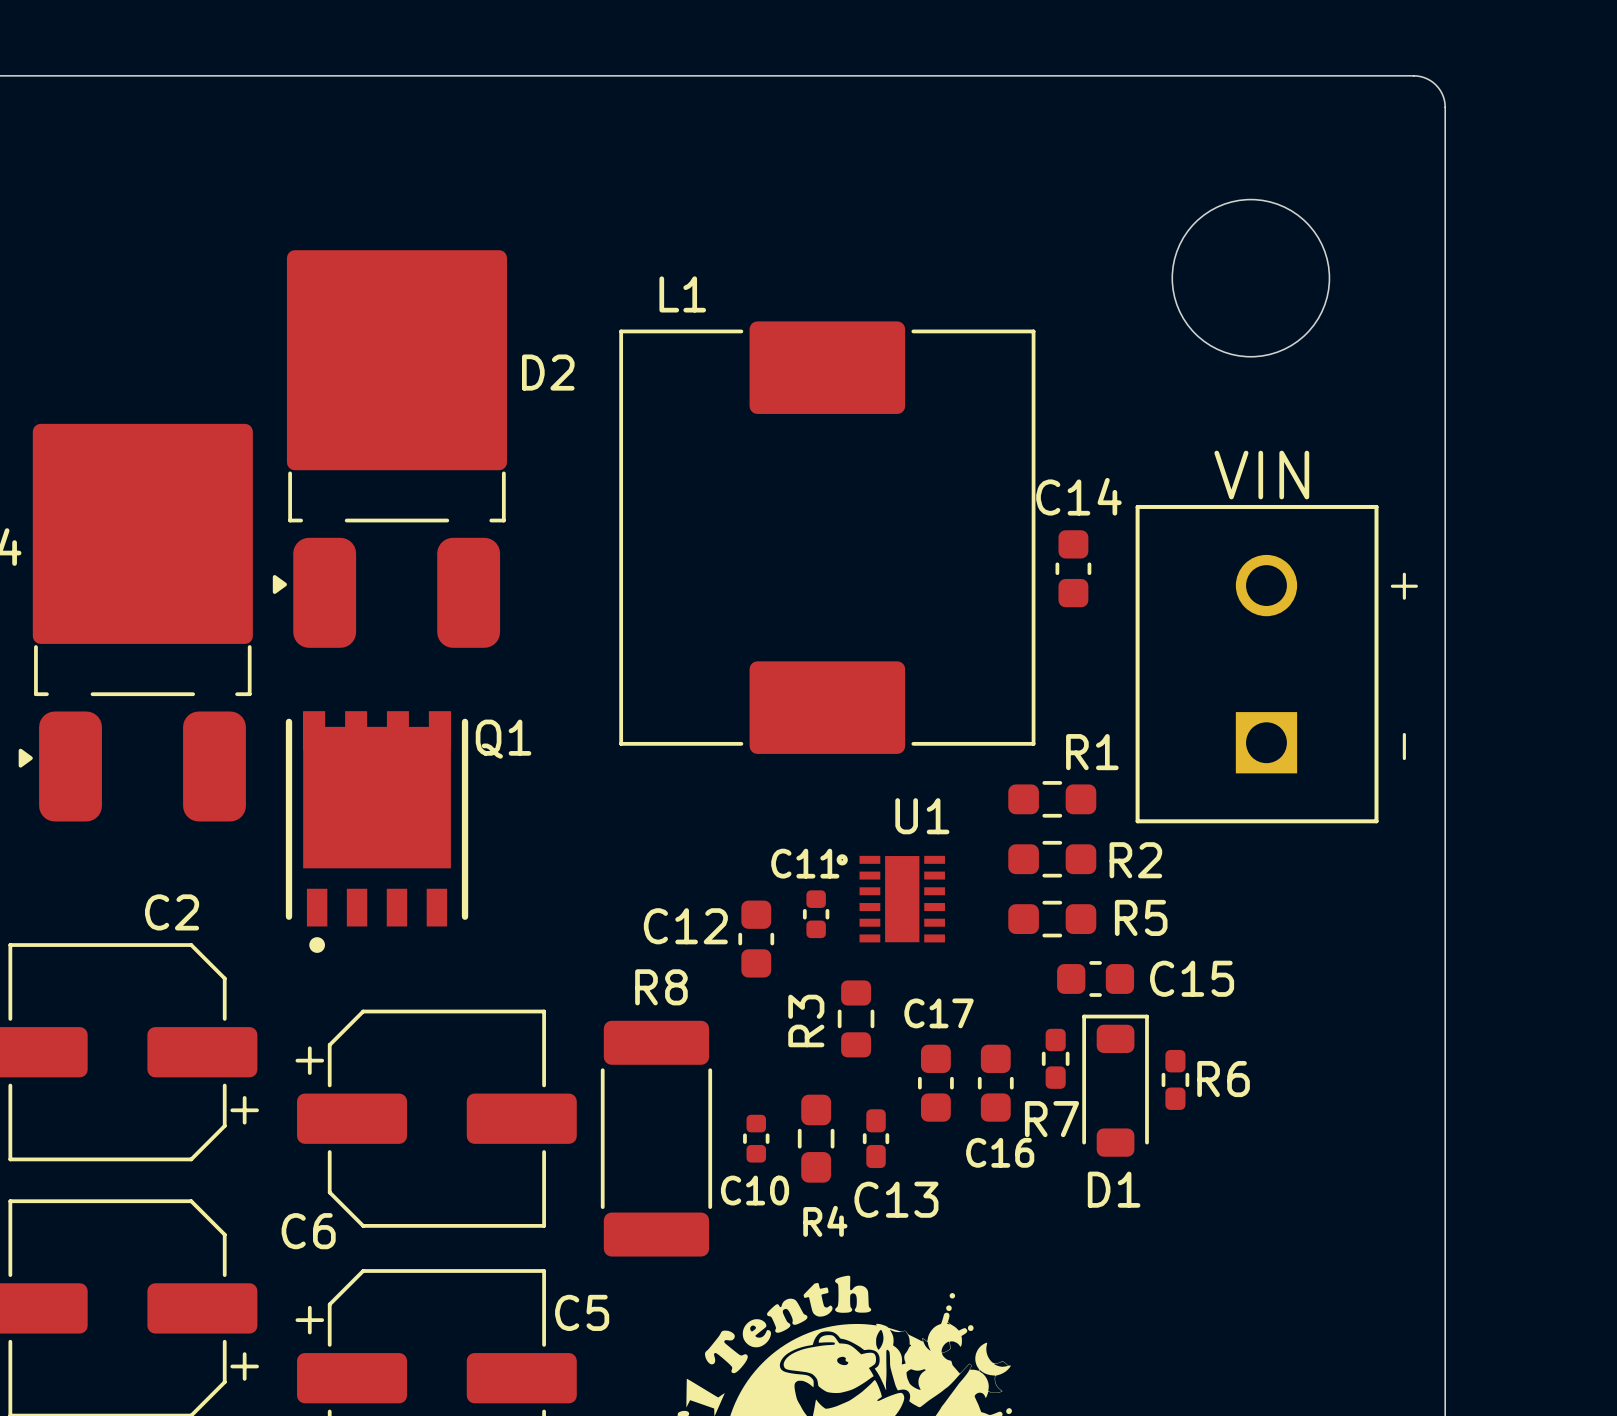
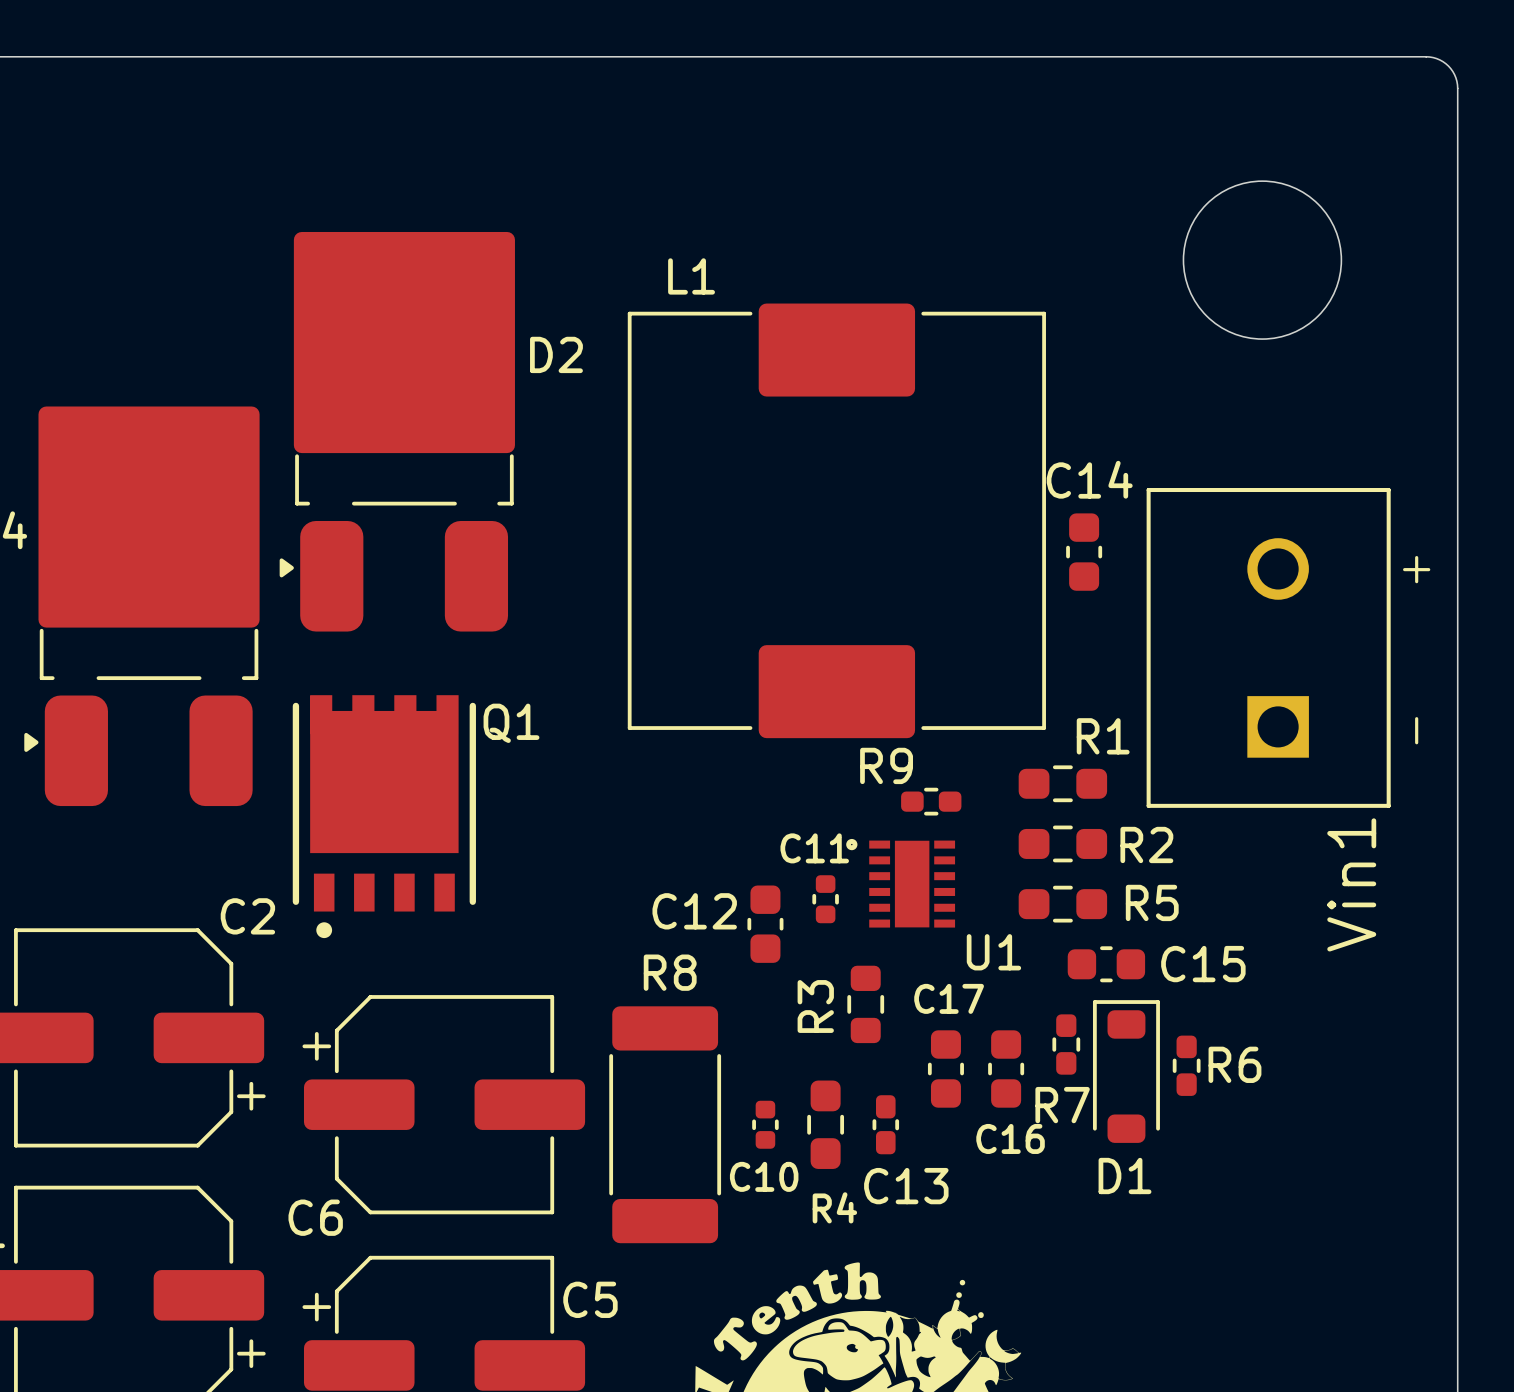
VIN name: VIN (1261, 475) -> Vin1 (1351, 884)
U1 name position: U1 (922, 816) -> U1 (993, 952)
R9: none -> (931, 801)
C2 name position: C2 (172, 912) -> C2 (247, 916)

